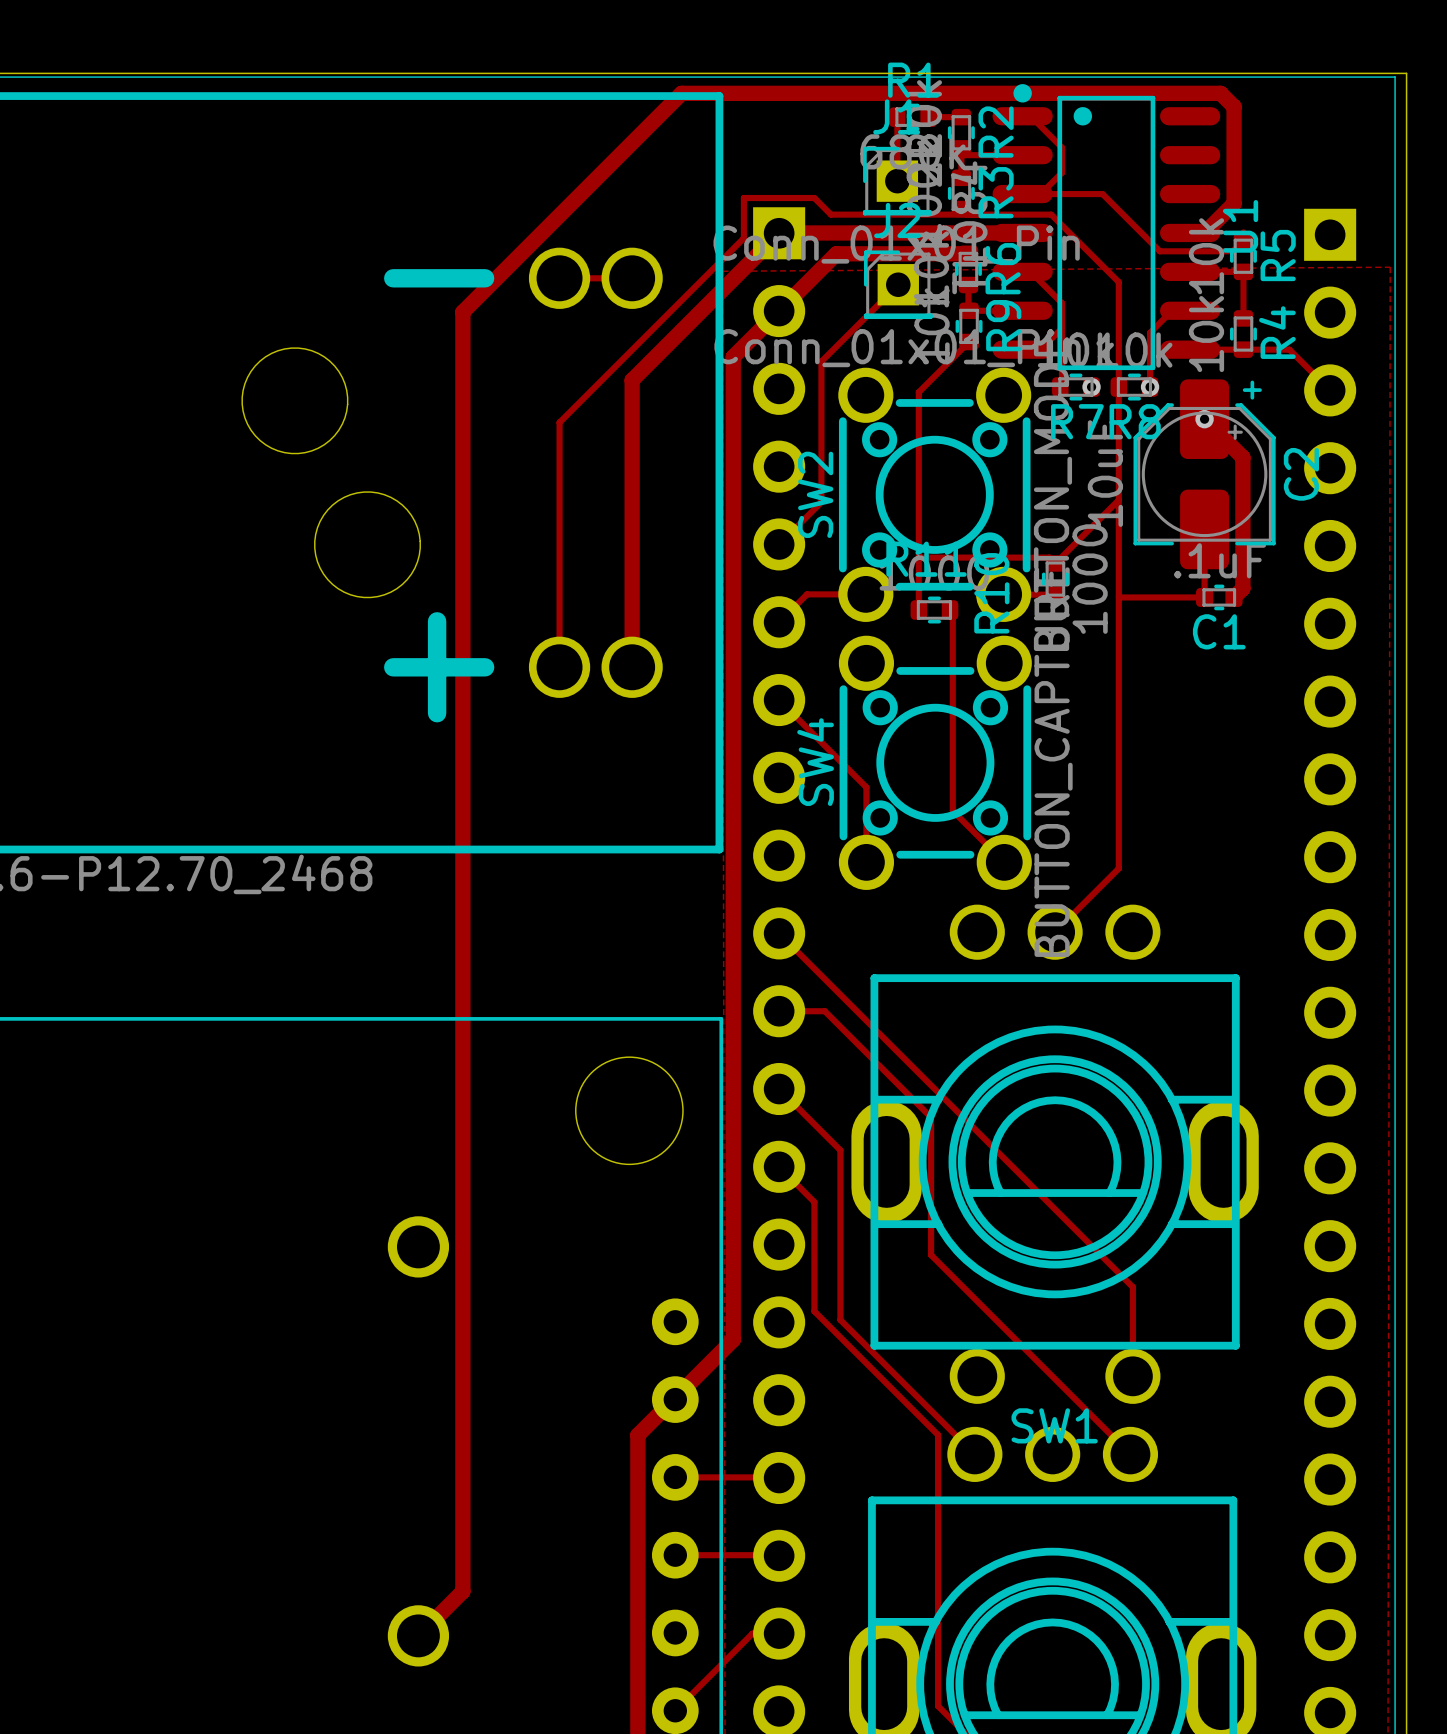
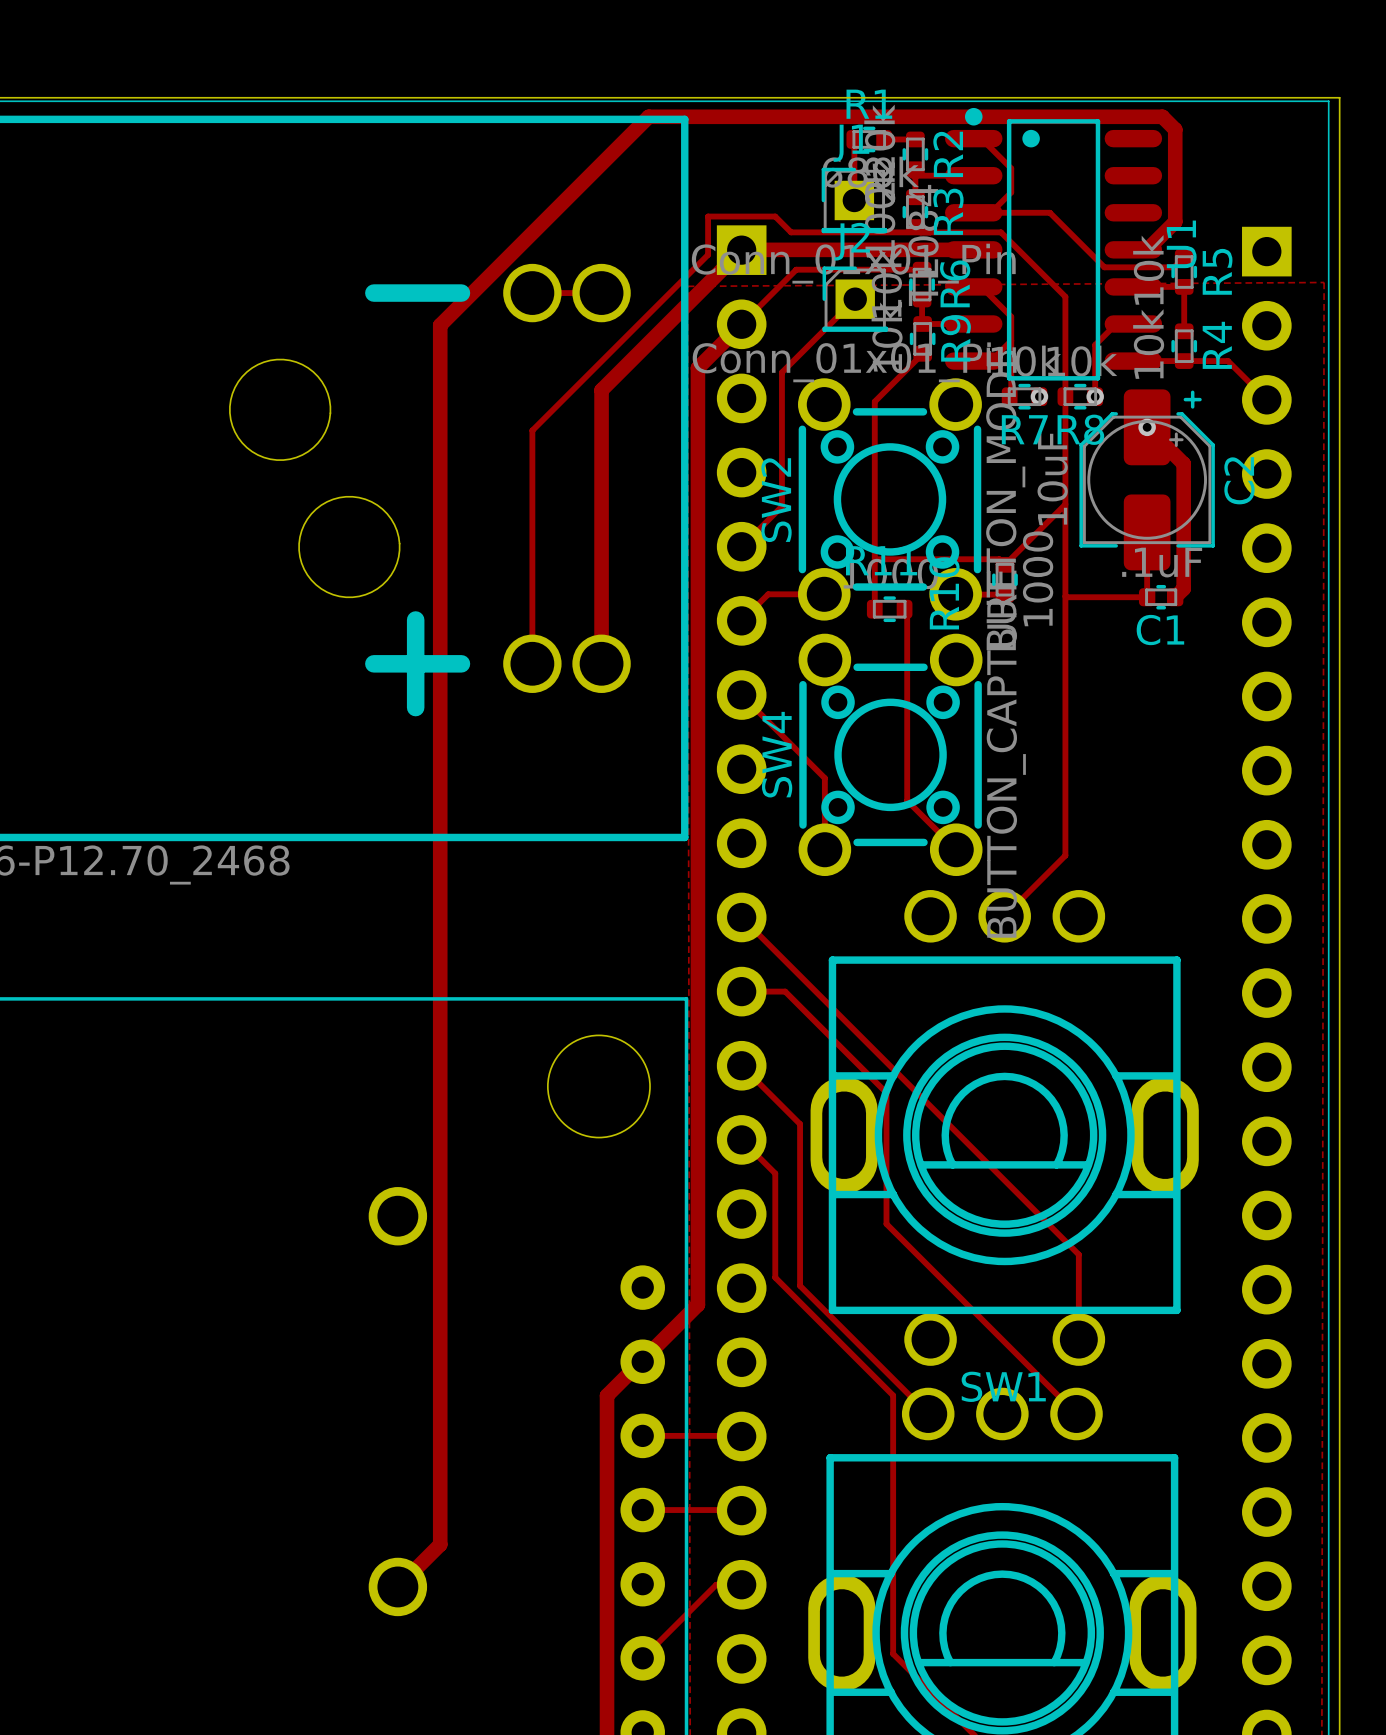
track width: thick (968, 253) (836, 253) (779, 311) -> thin (922, 269) (796, 269) (741, 324)

